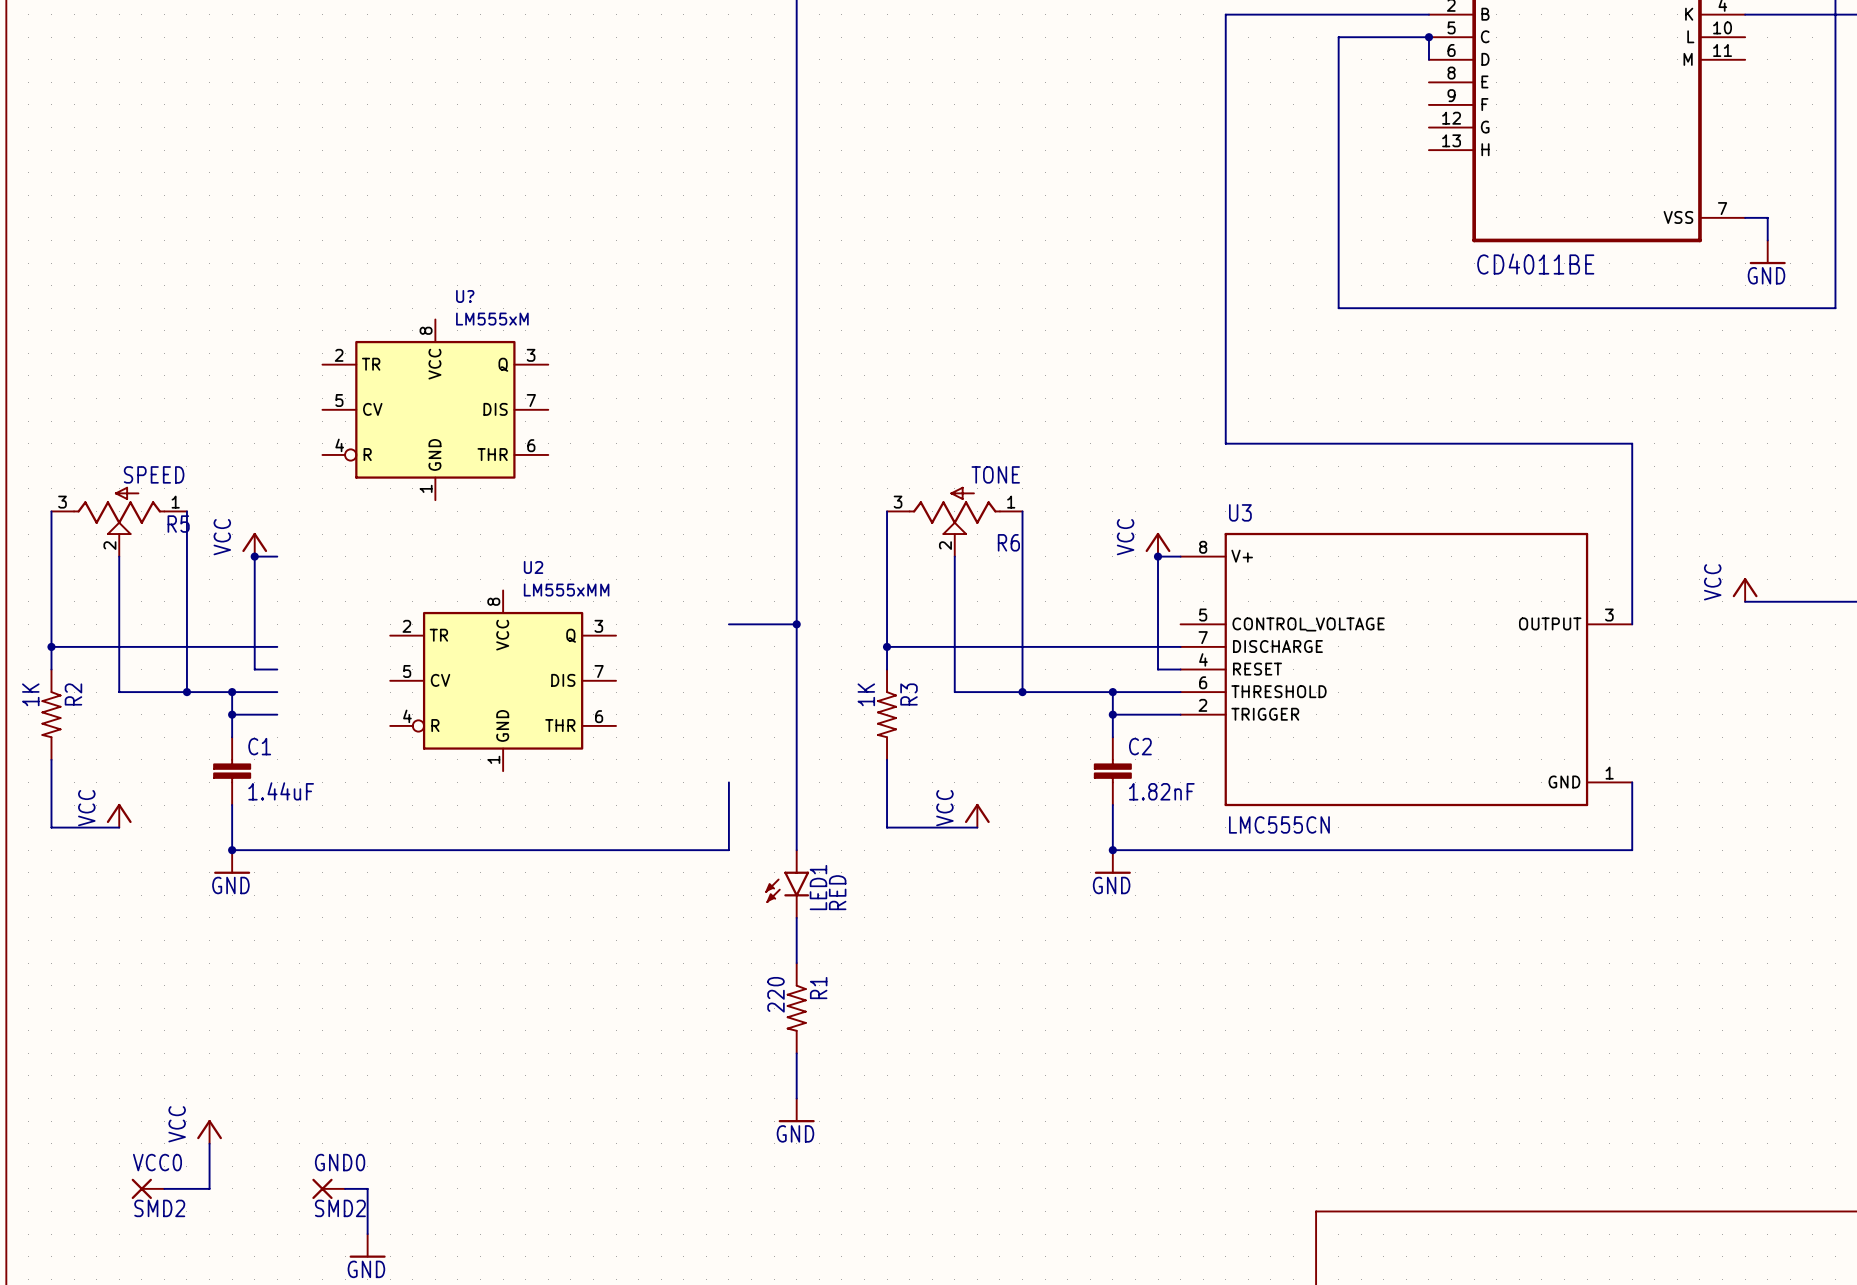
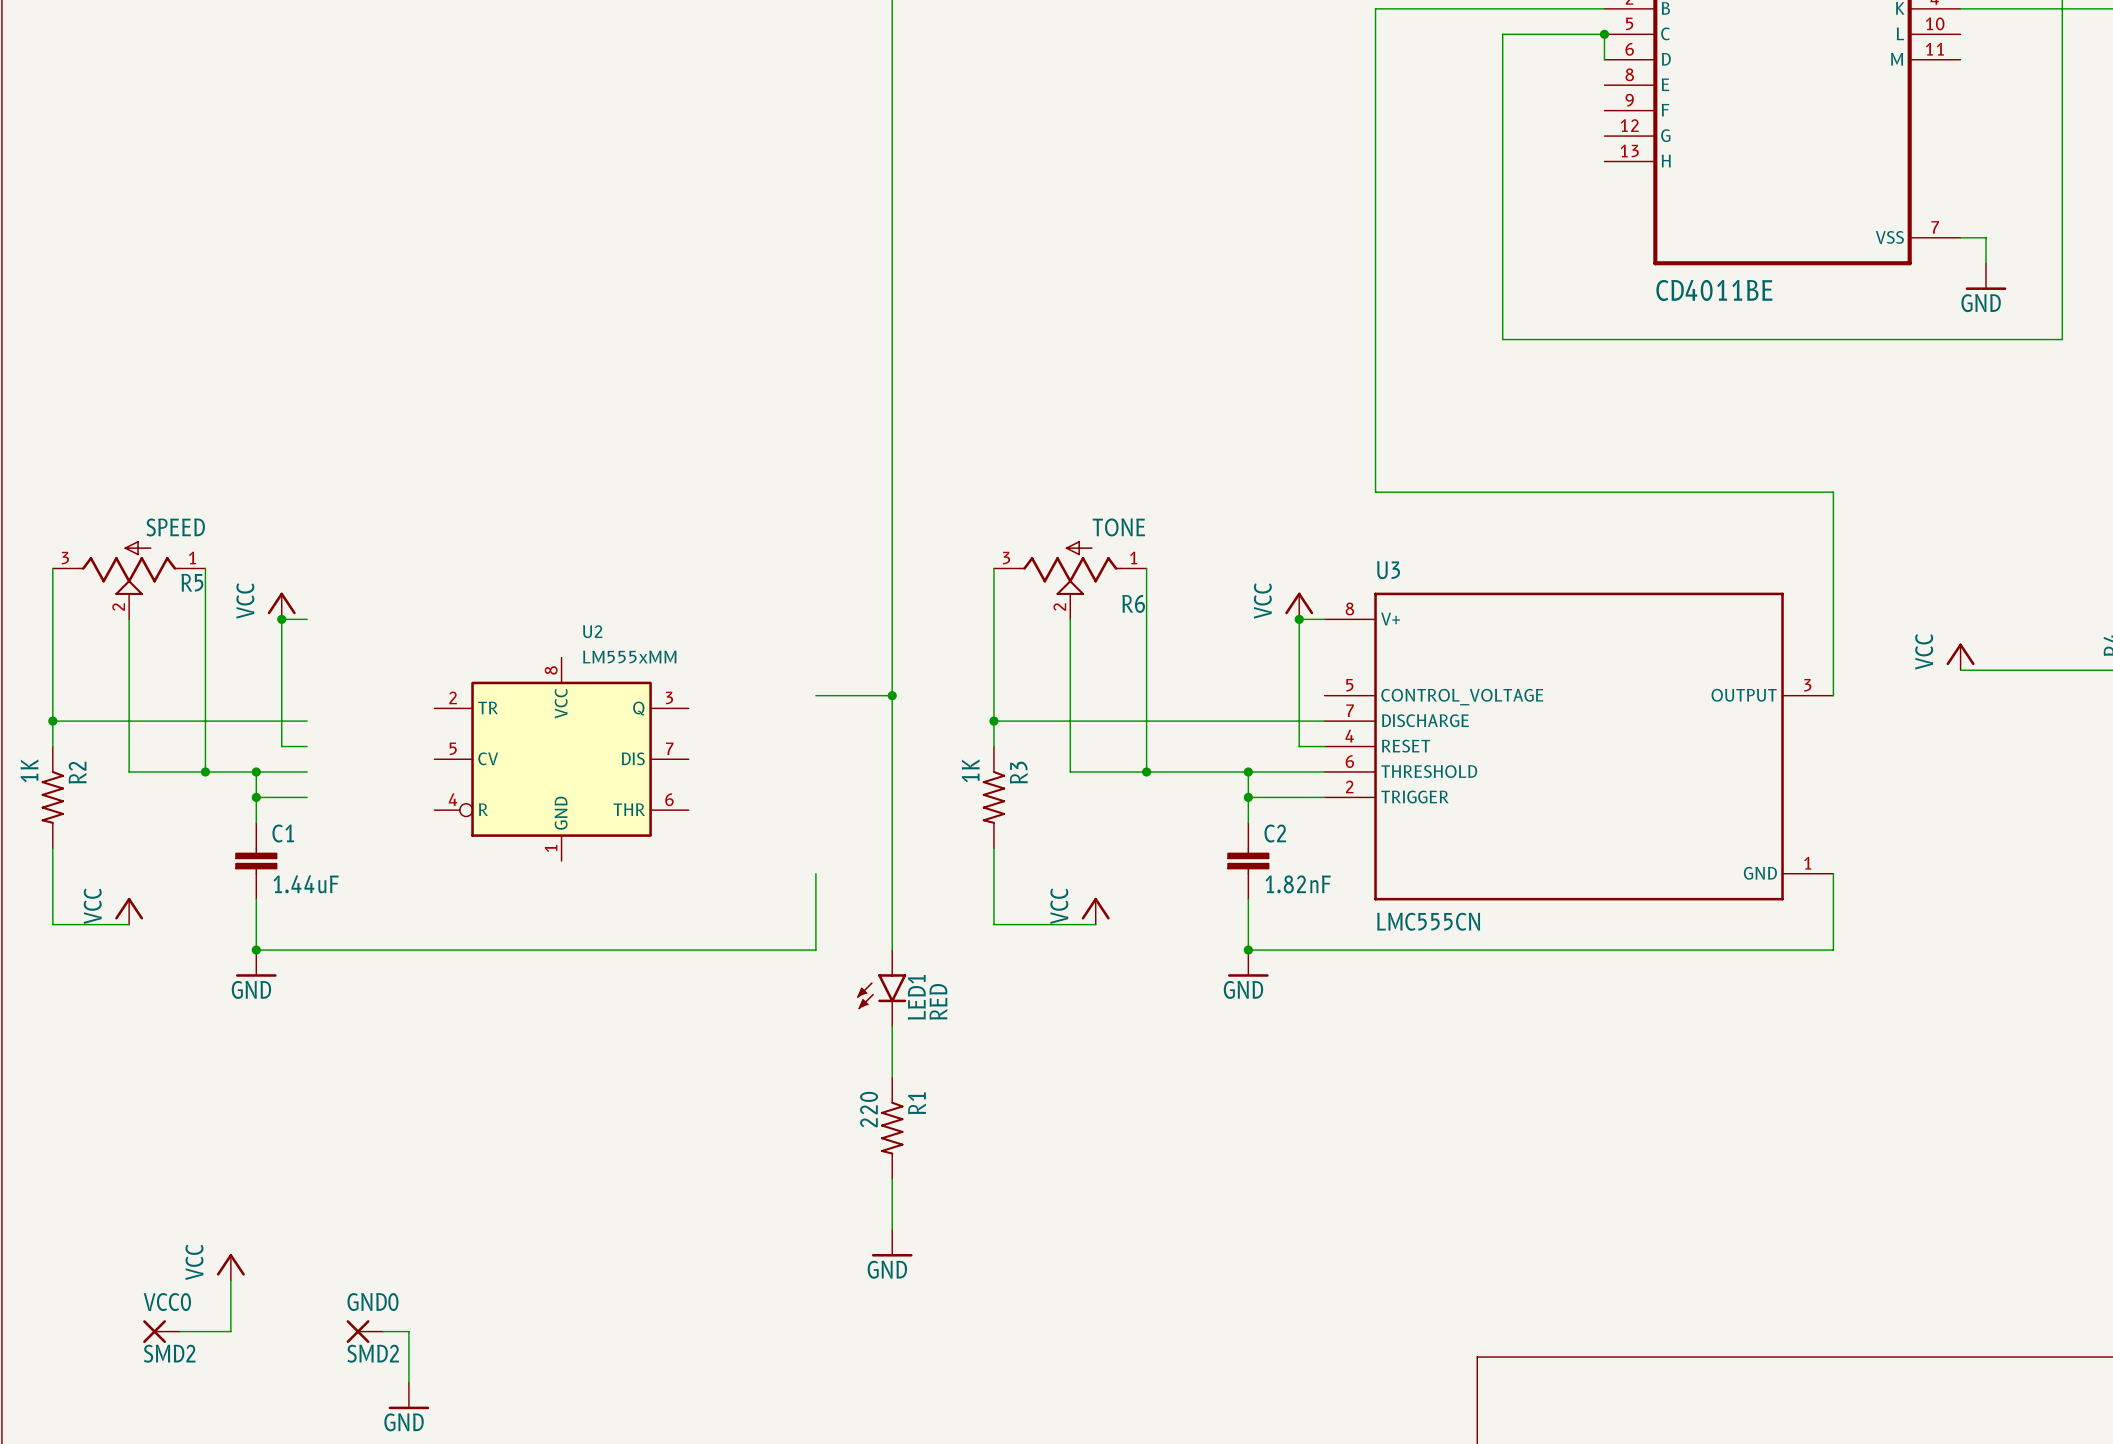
U?: LM555xM (435, 409) -> none

